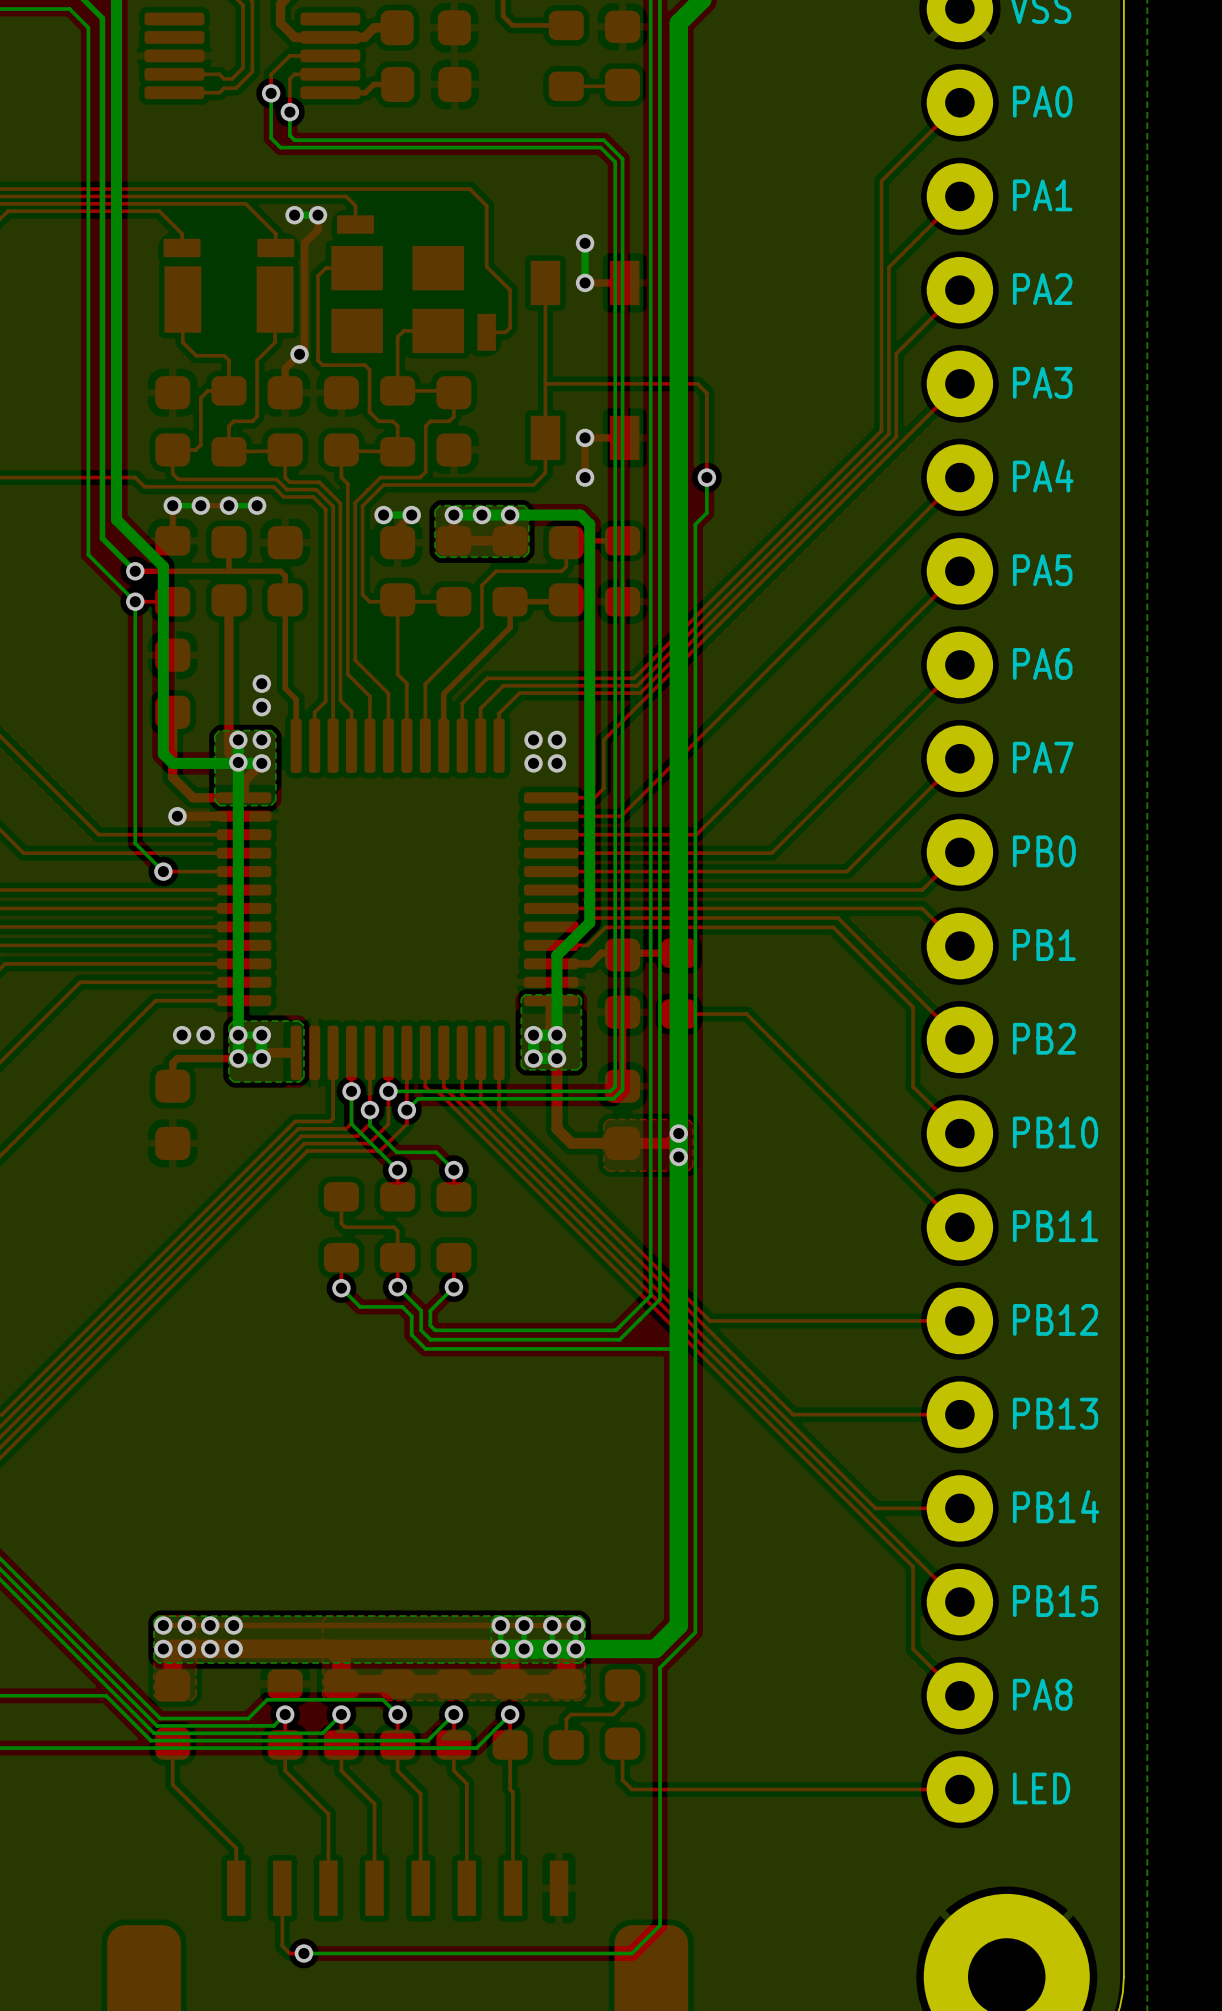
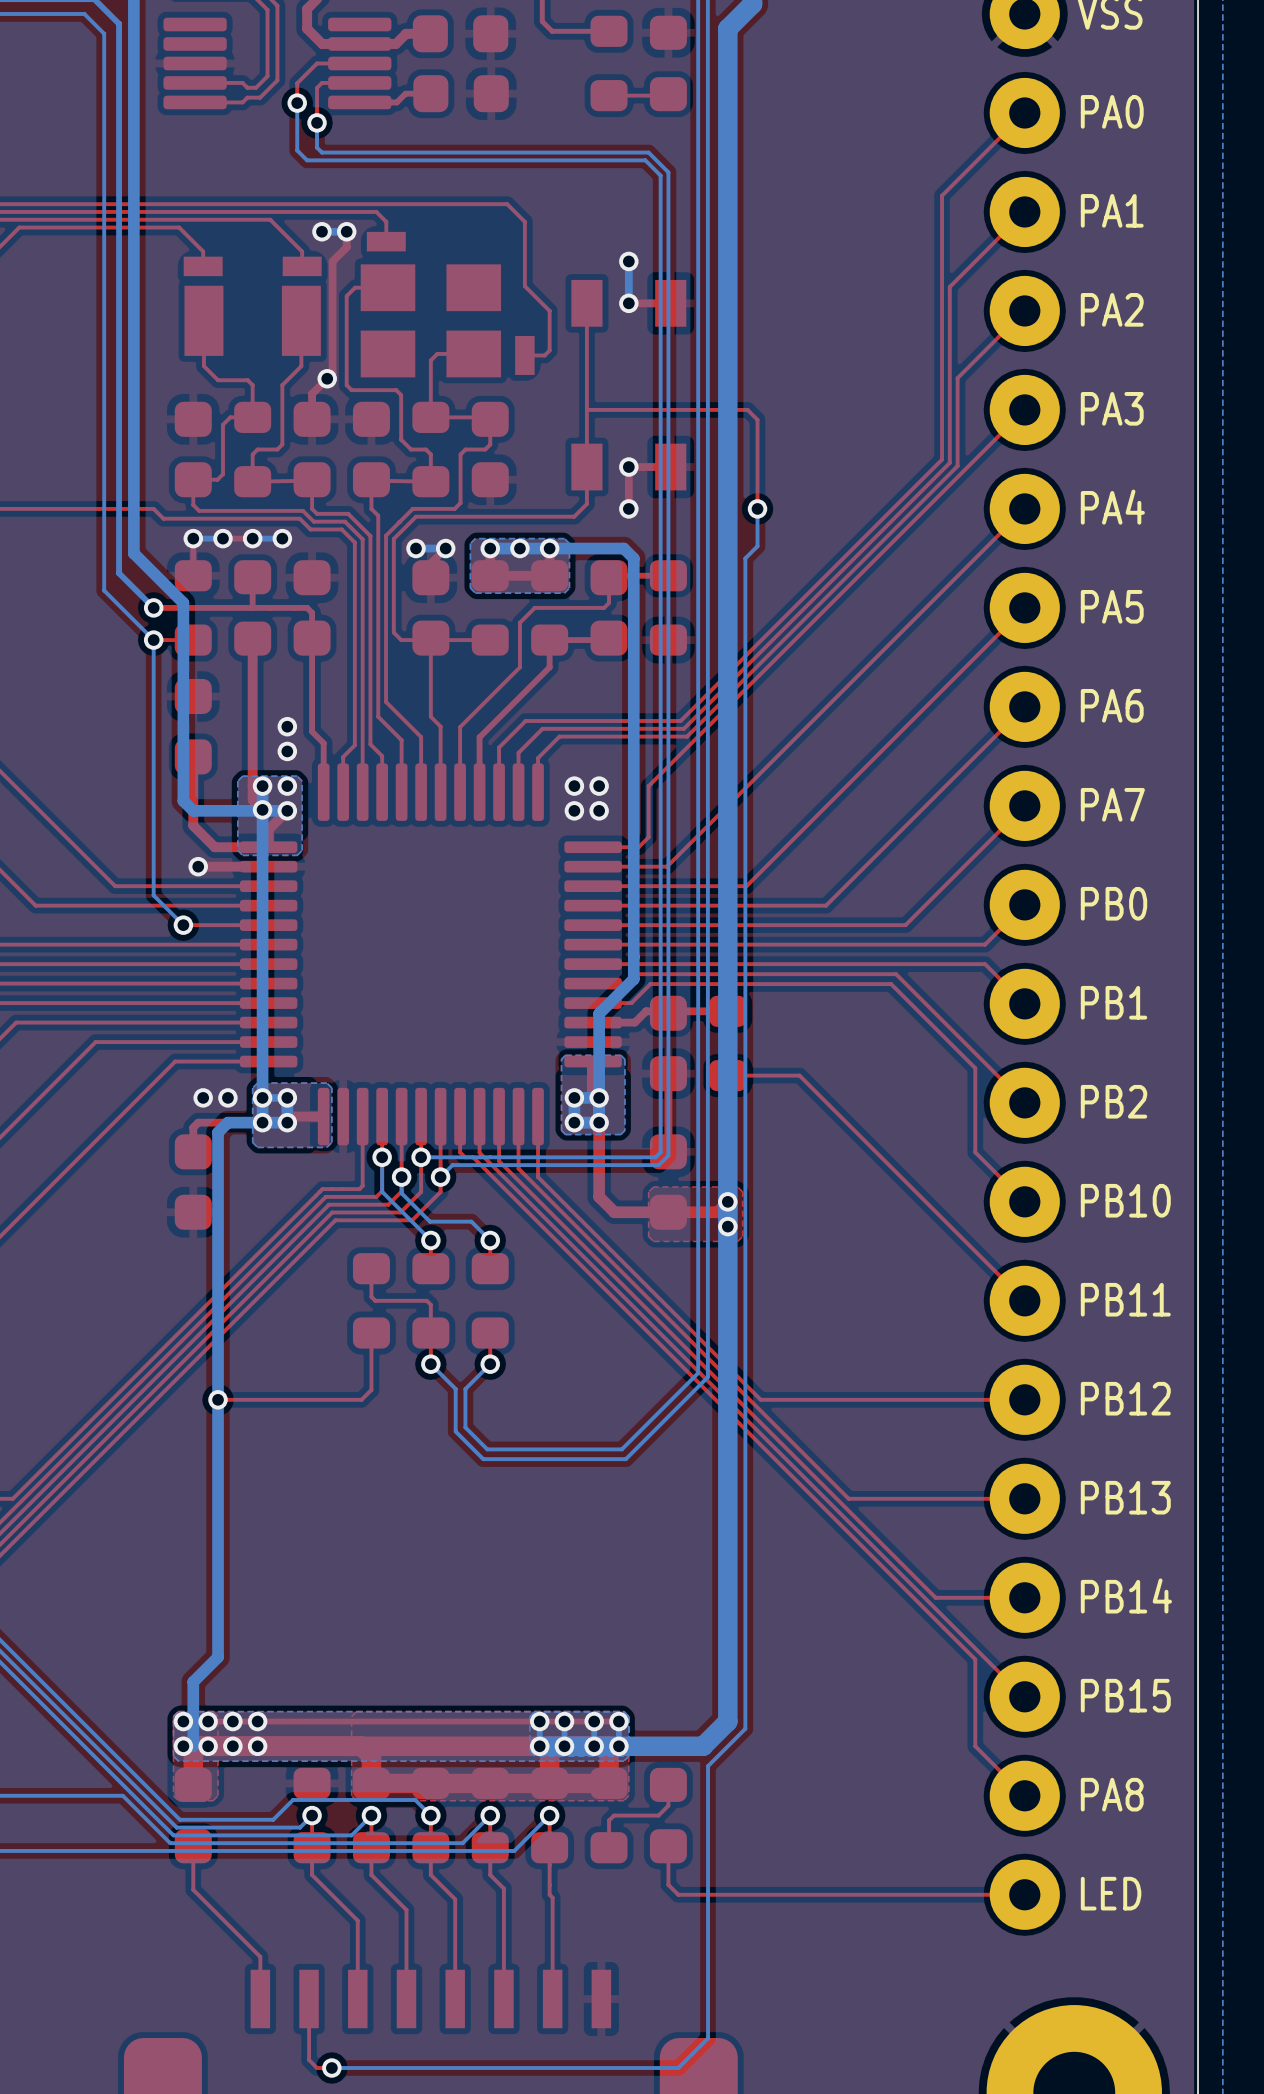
bottom track: none -> (287, 1122) (227, 1122) (218, 1132) (218, 1657) (193, 1681) (193, 1746)
top track: none -> (371, 1365) (371, 1389) (361, 1399) (218, 1399)
bottom track: (341, 1288) (360, 1306) (402, 1306) (411, 1316) (411, 1335) (425, 1348) (678, 1348) -> none
via position: (341, 1288) -> (218, 1399)
bottom track: (430, 1325) (435, 1330) (616, 1330) -> (465, 1404) (465, 1427) (487, 1449) (621, 1449) (661, 1409)
bottom track: (421, 1330) (430, 1339) (619, 1339) -> (455, 1409) (455, 1431) (483, 1459) (625, 1459) (665, 1419)

